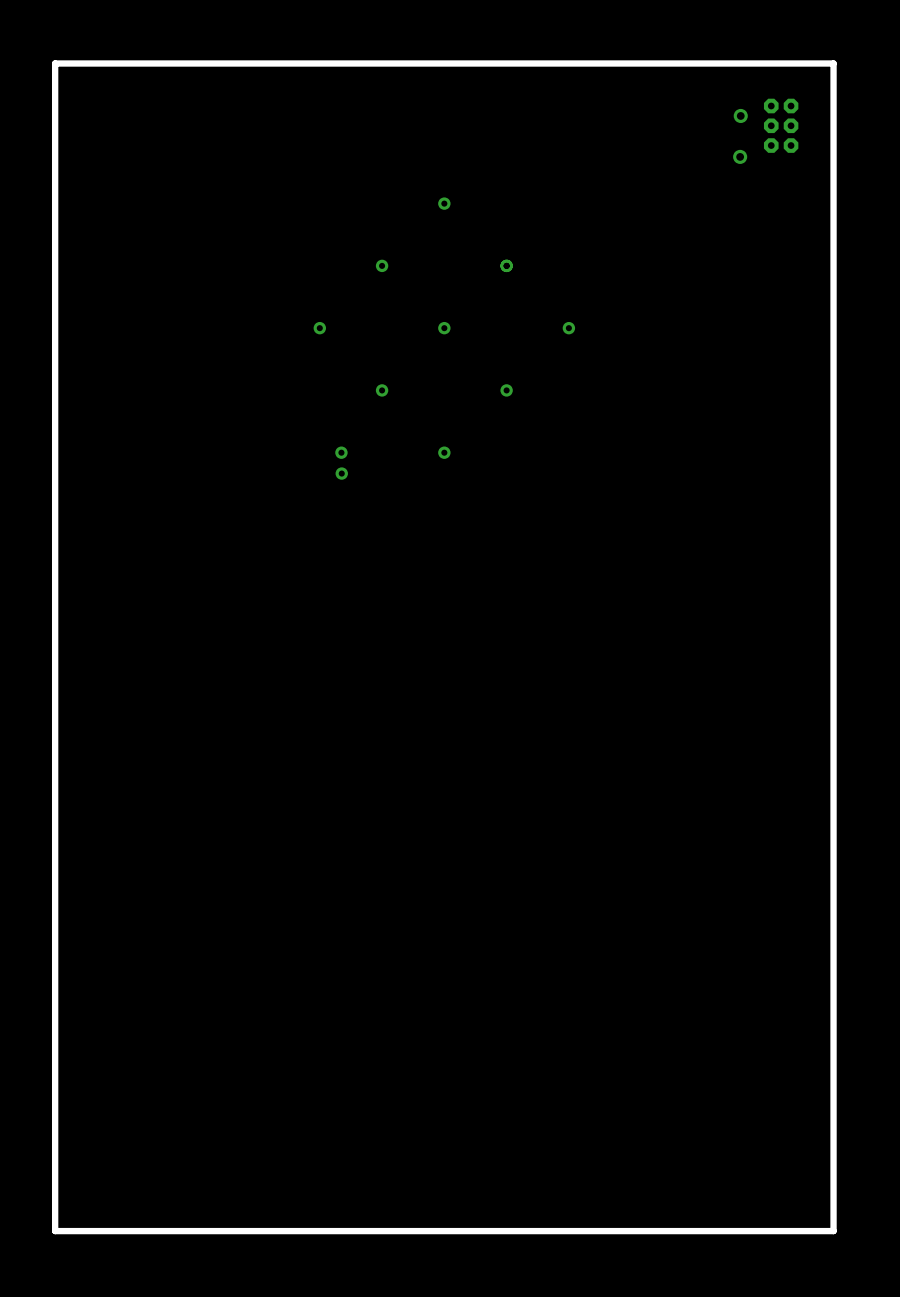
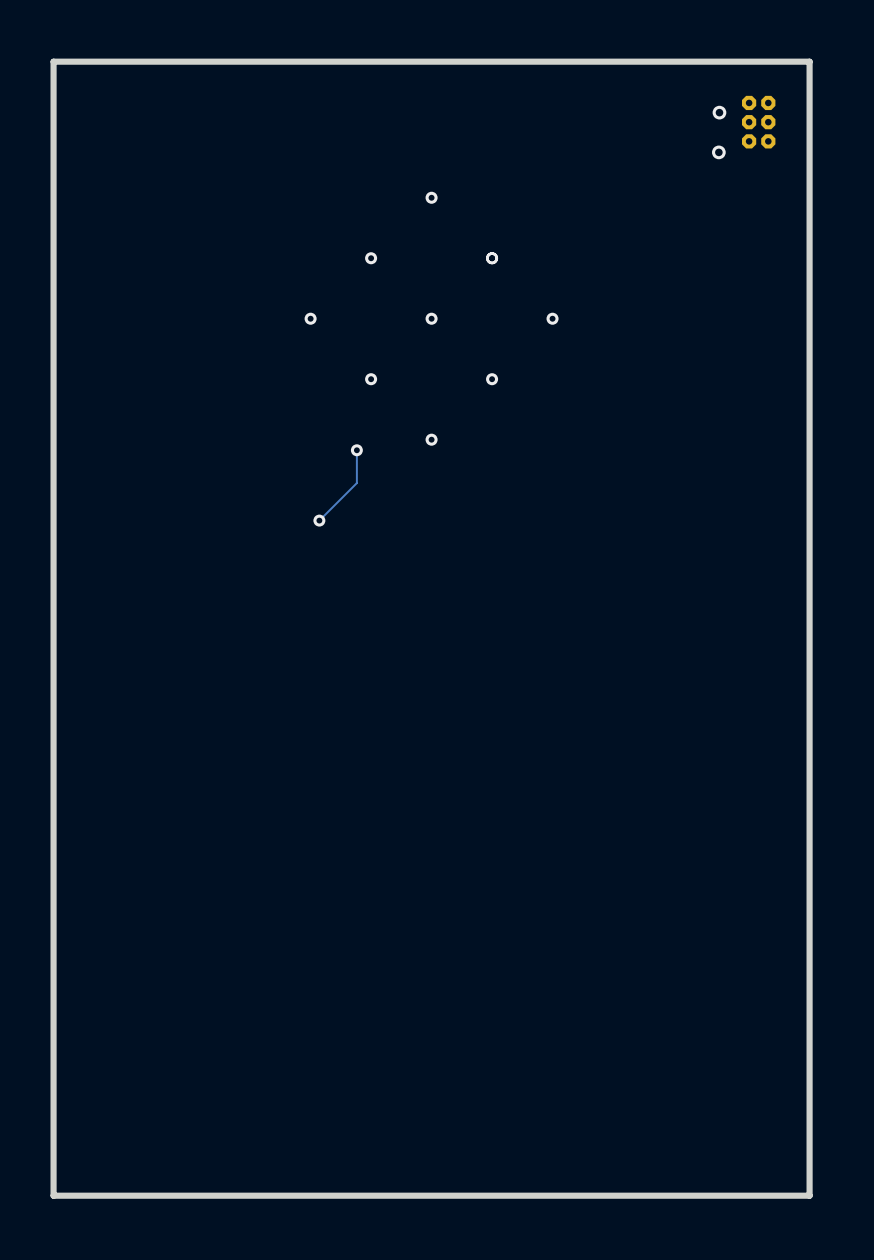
via: (341, 452) -> none
track: none -> (356, 450) (356, 483) (319, 520)
via: none -> (356, 450)
via: (341, 473) -> none
via: none -> (319, 520)

